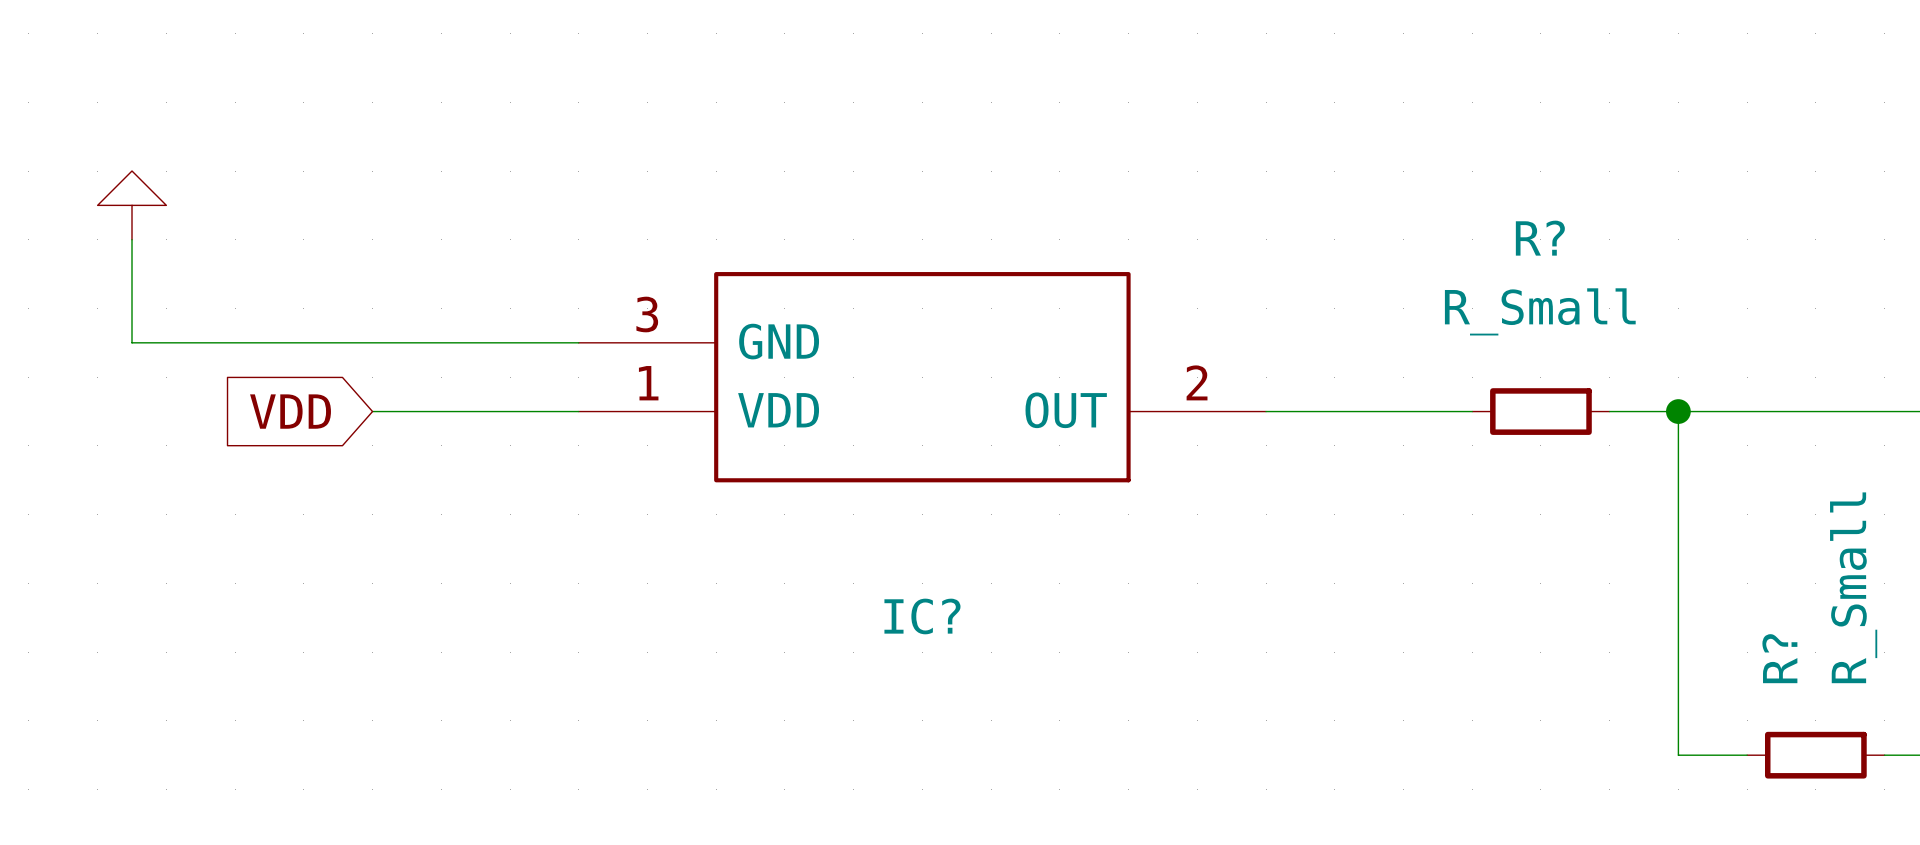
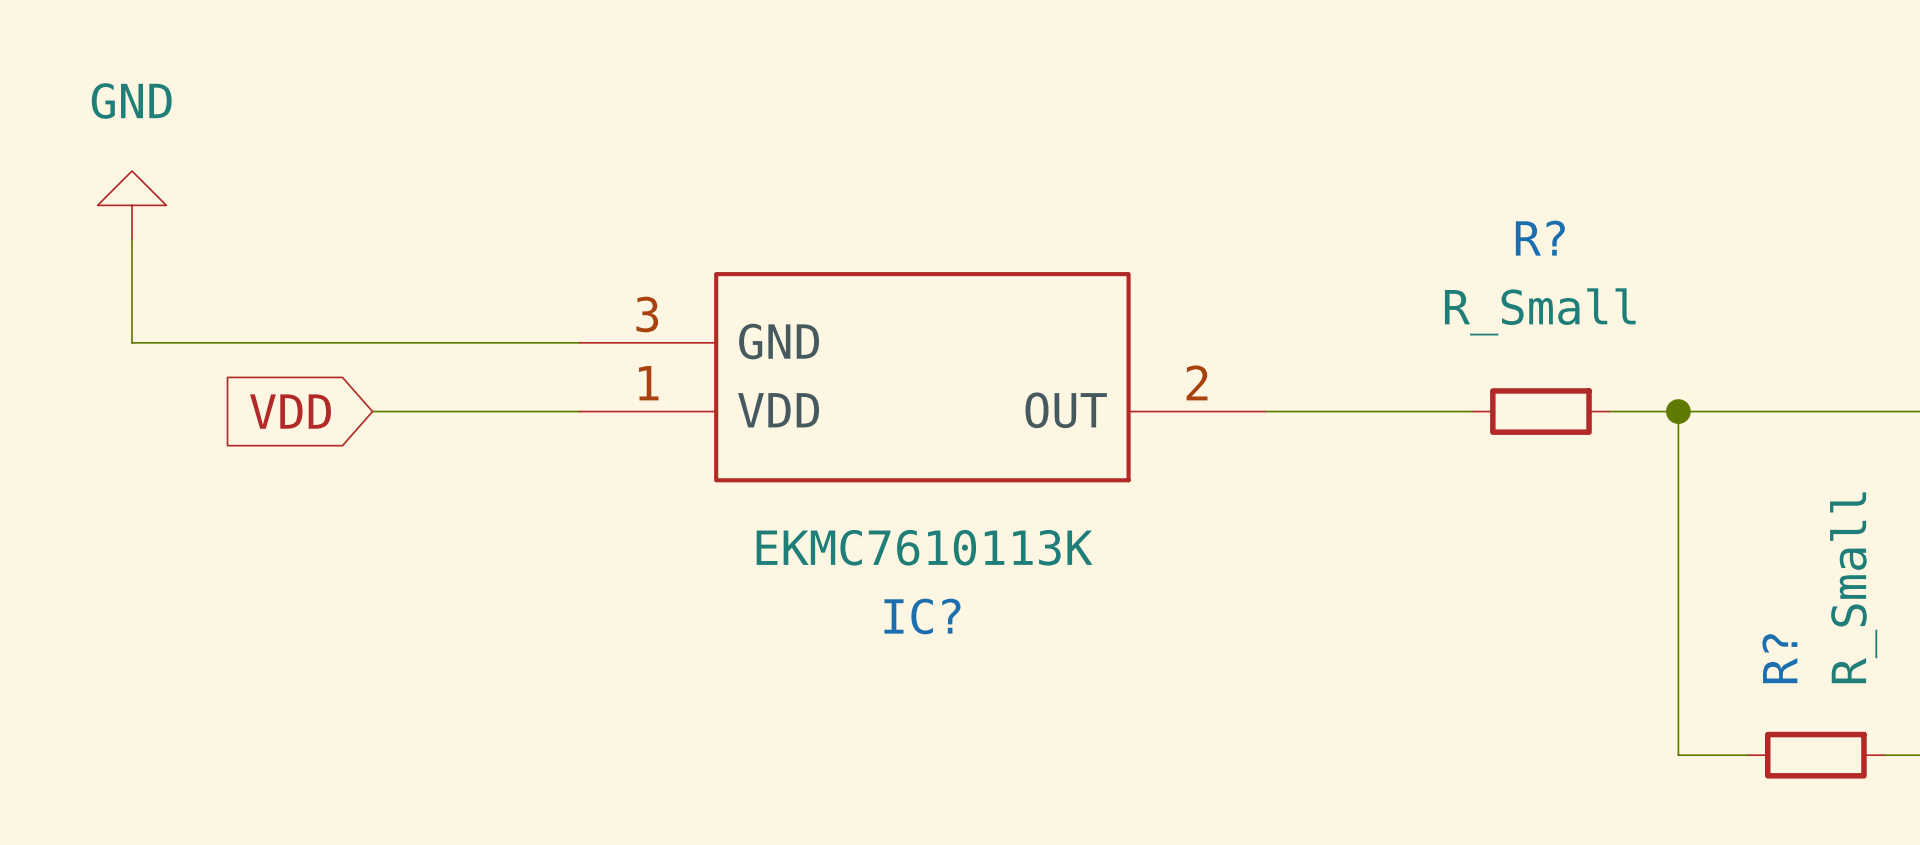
power symbol text: none -> GND (131, 101)
IC? value: none -> EKMC7610113K (924, 547)

